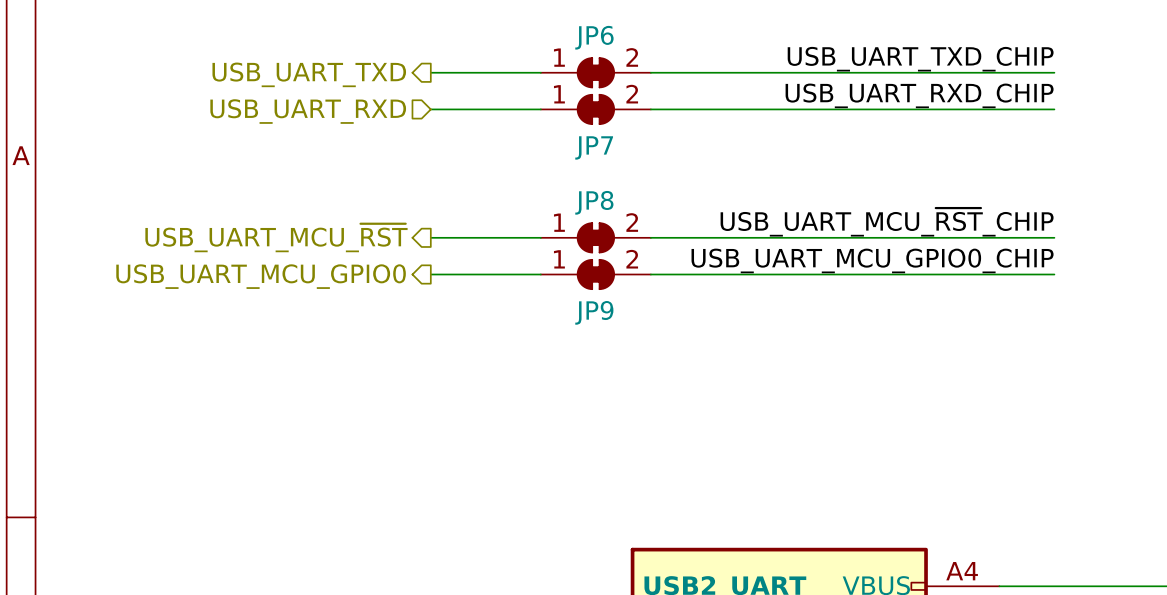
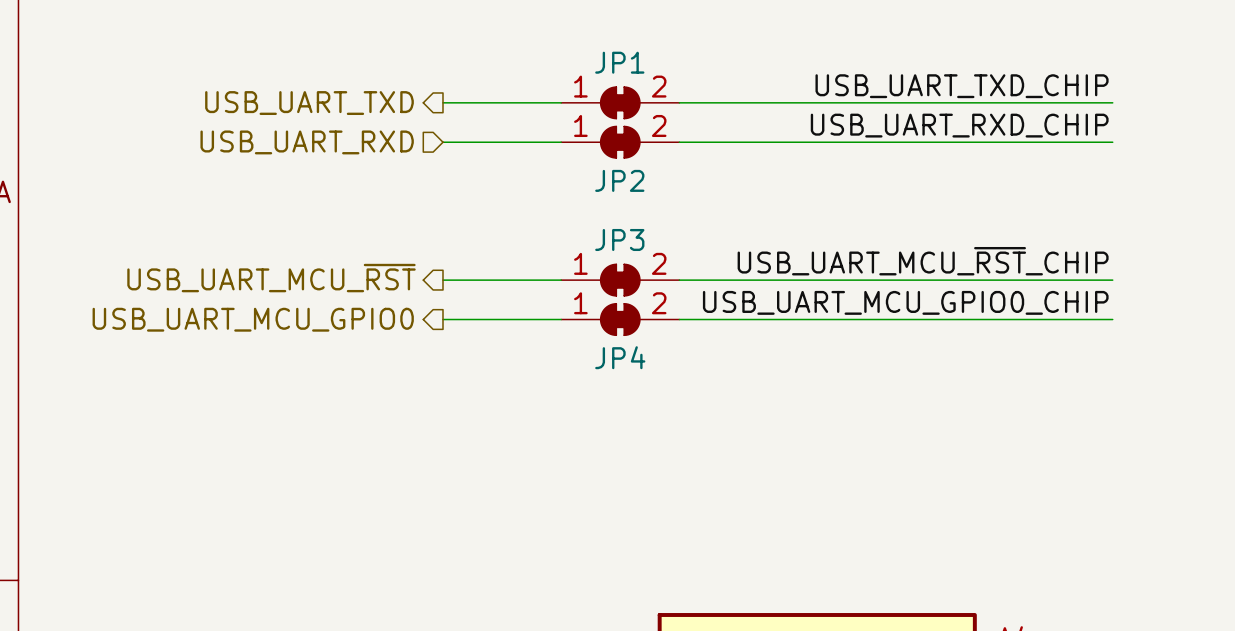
JP6 name: JP6 (594, 37) -> JP1 (619, 62)
JP7 name: JP7 (594, 147) -> JP2 (619, 180)
JP8 name: JP8 (594, 202) -> JP3 (619, 239)
JP9 name: JP9 (594, 312) -> JP4 (620, 357)

